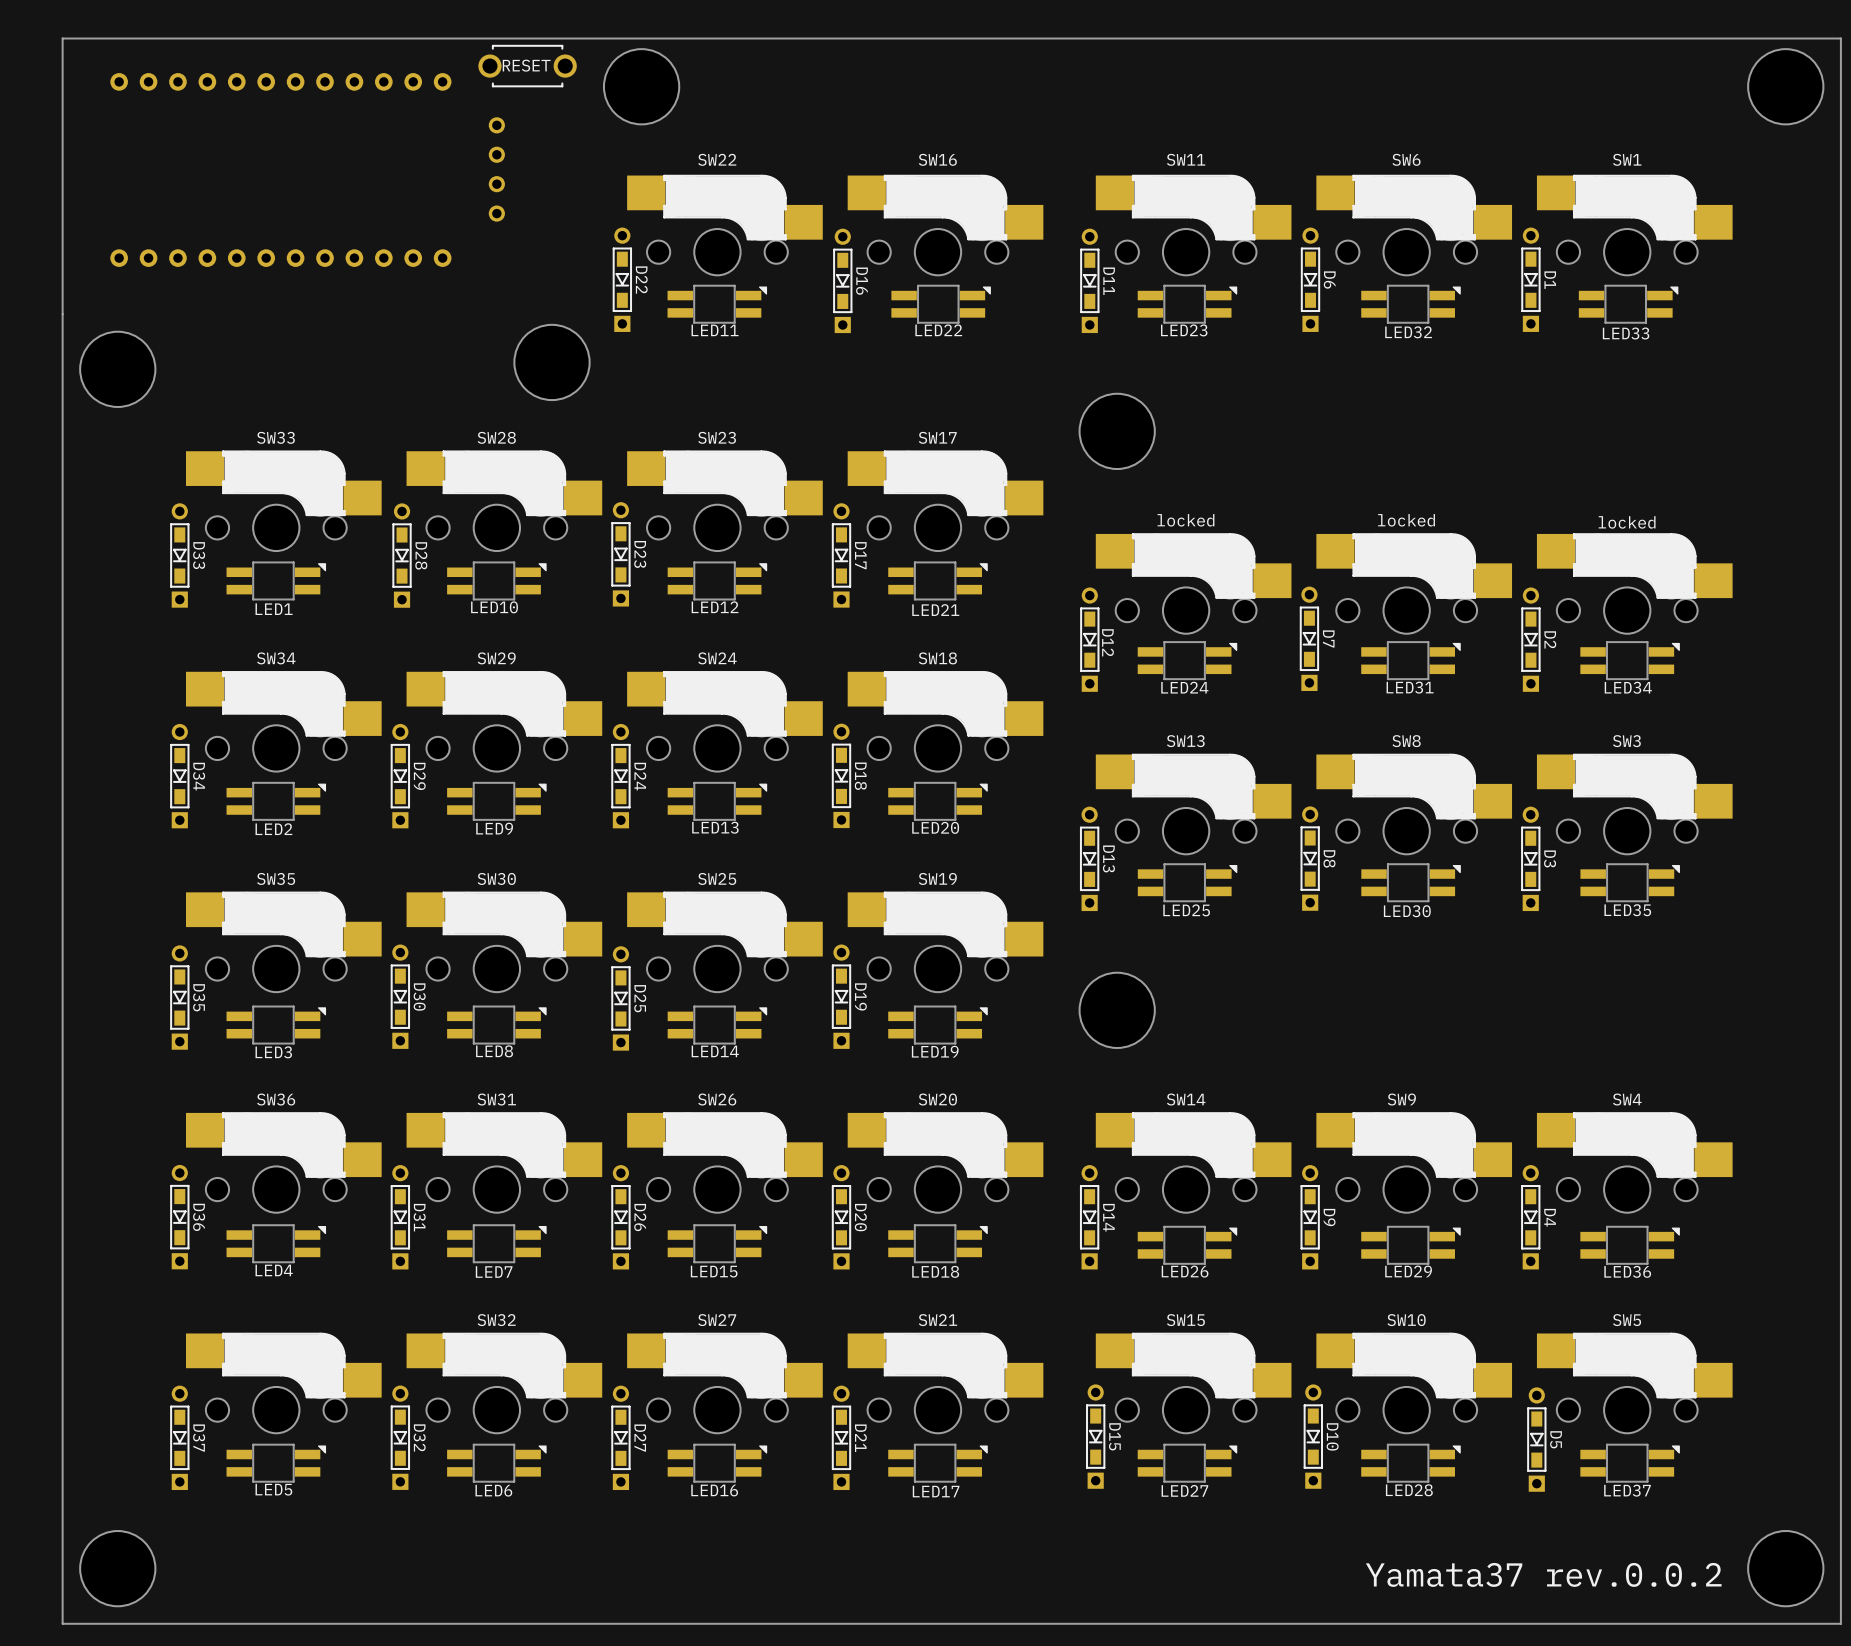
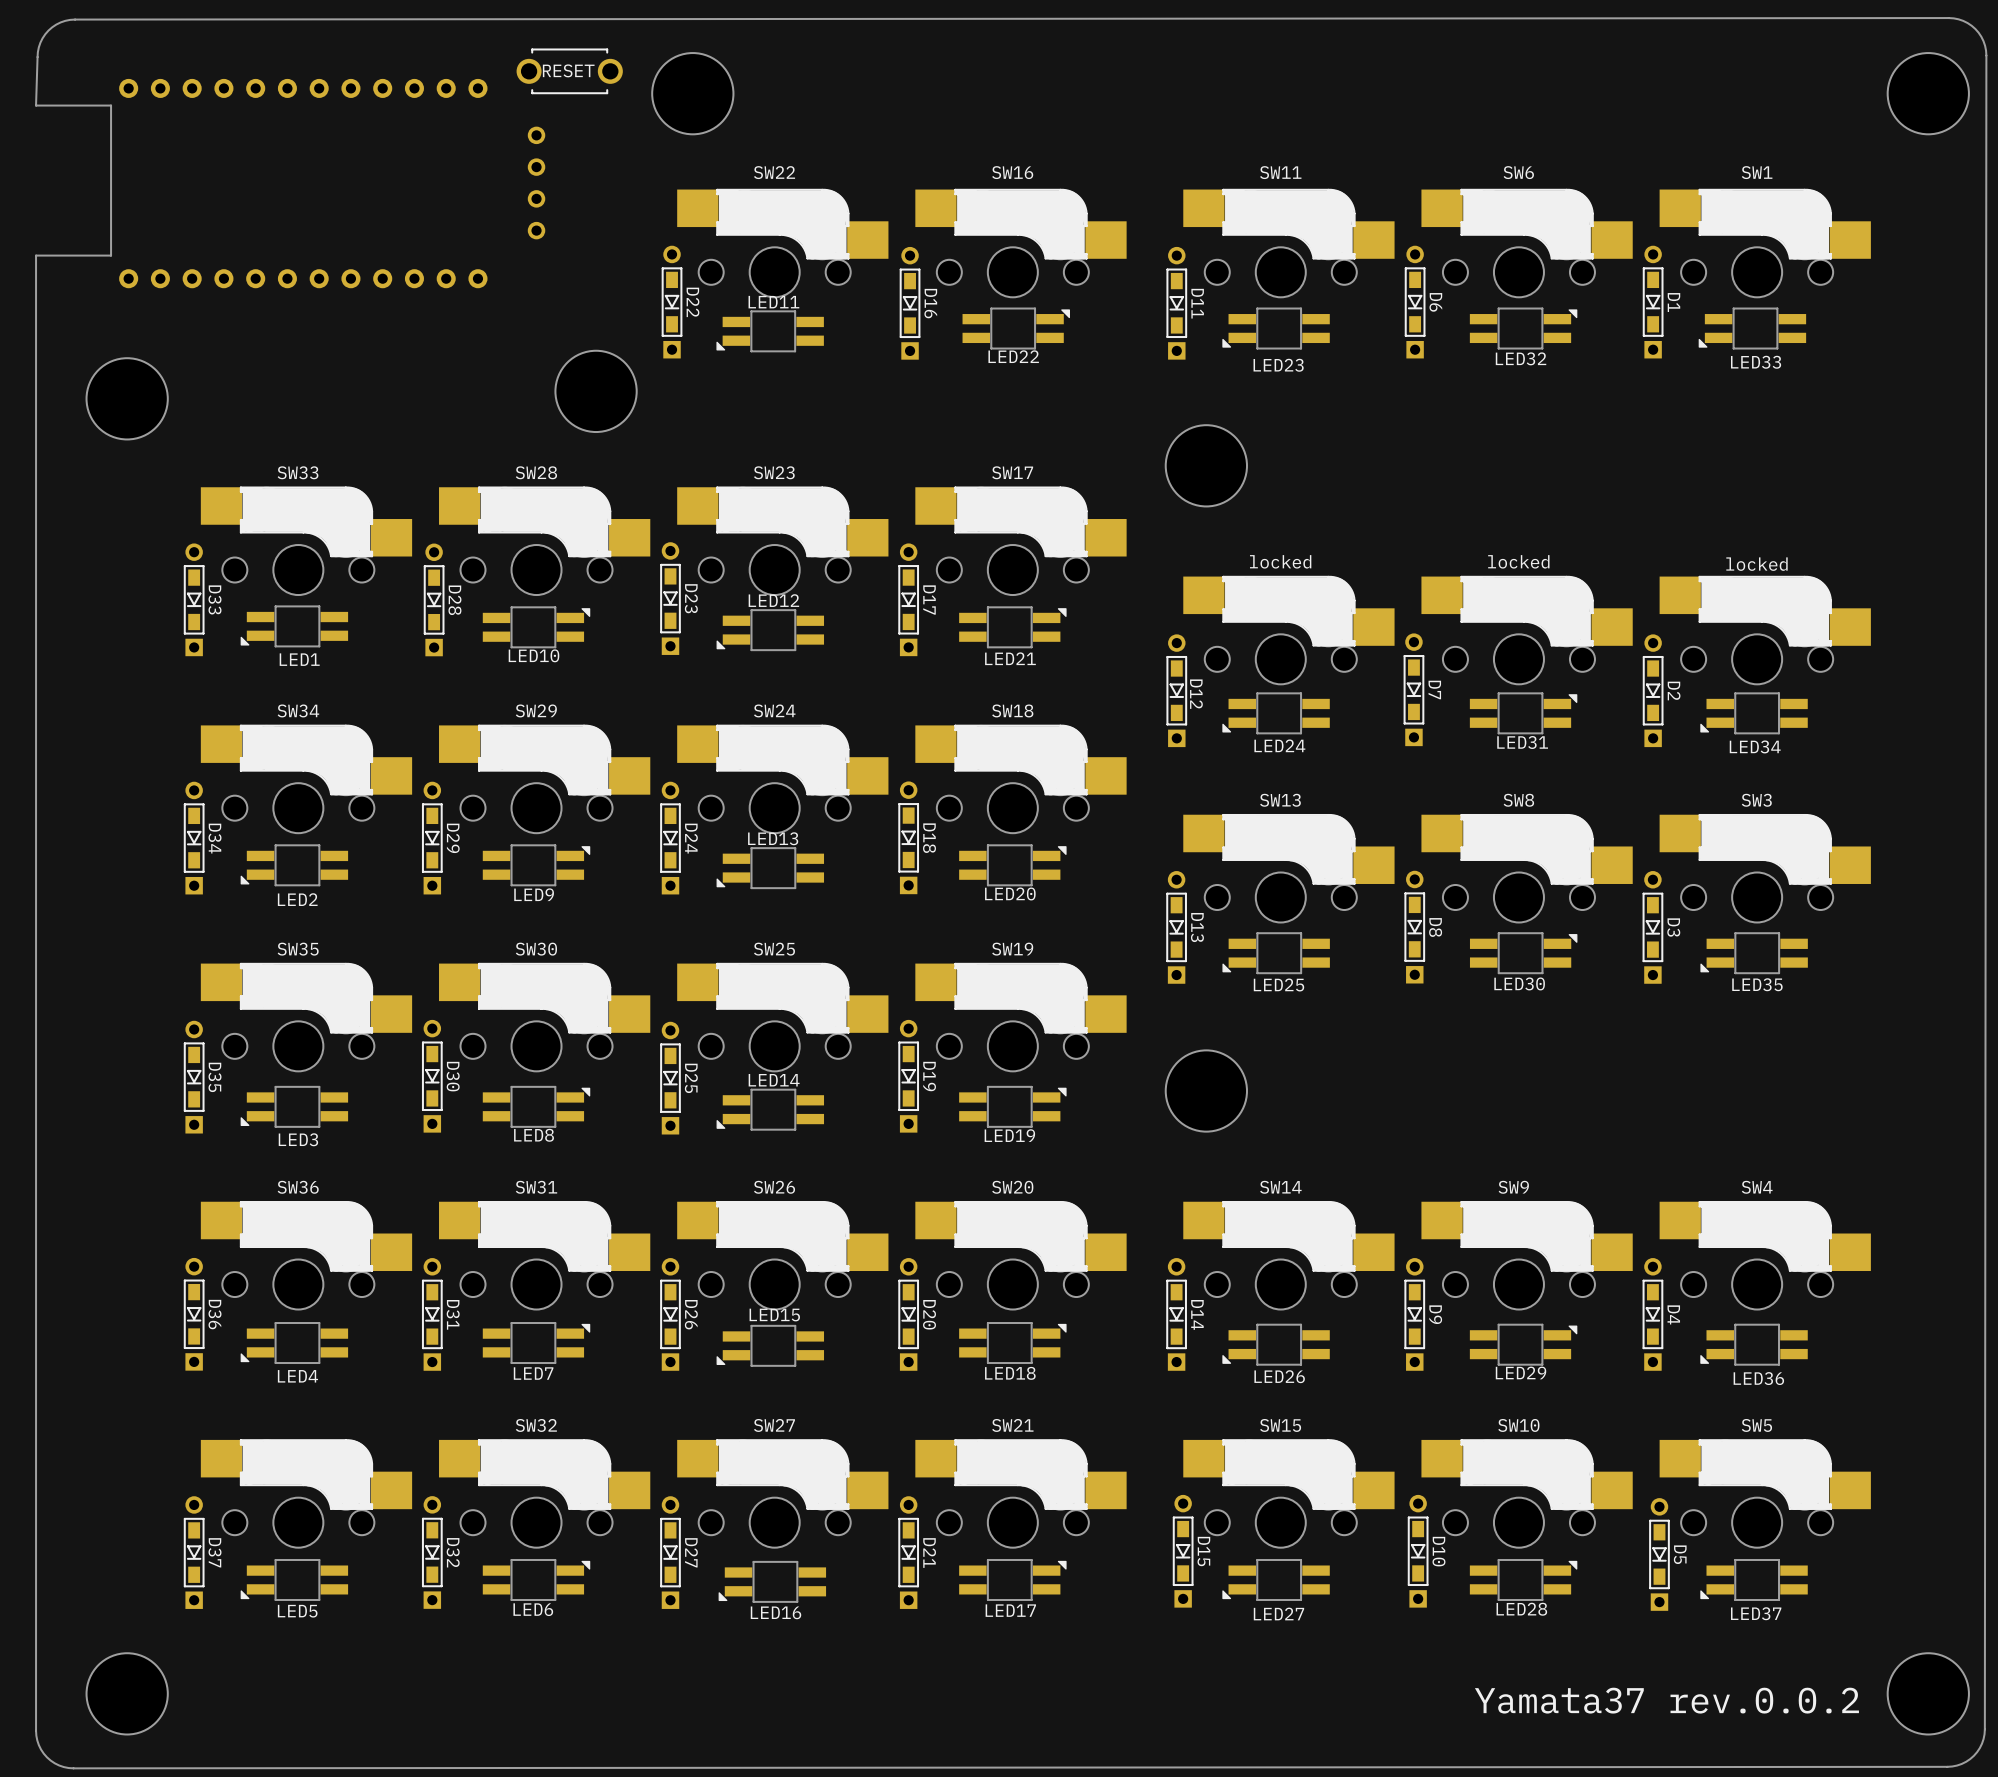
board edge: (1840, 38) (1840, 1623) (62, 1623) (62, 38) (1840, 38) -> (1948, 18) (1963, 20) (1975, 29) (1983, 41) (1986, 55) (1984, 1729) (1982, 1743) (1973, 1755) (1961, 1763) (1947, 1766) (73, 1768) (59, 1765) (47, 1757) (38, 1745) (36, 1730) (36, 255) (111, 255) (111, 105) (36, 105) (37, 52) (42, 38) (48, 30) (60, 22) (75, 19) (1948, 18)
LED11 rotation: 0° (717, 304) -> 180° (770, 331)
LED23 rotation: 0° (1187, 304) -> 180° (1276, 328)
LED33 rotation: 0° (1628, 304) -> 180° (1752, 328)
LED1 rotation: 0° (276, 580) -> 180° (294, 626)
LED12 rotation: 0° (717, 580) -> 180° (770, 630)
LED24 rotation: 0° (1187, 660) -> 180° (1276, 713)
LED34 rotation: 0° (1630, 660) -> 180° (1754, 713)
LED2 rotation: 0° (276, 801) -> 180° (294, 865)
LED13 rotation: 0° (717, 801) -> 180° (770, 868)
LED25 rotation: 0° (1187, 882) -> 180° (1276, 953)
LED35 rotation: 0° (1630, 882) -> 180° (1754, 953)
LED3 rotation: 0° (276, 1025) -> 180° (294, 1106)
LED14 rotation: 0° (717, 1025) -> 180° (770, 1109)
LED4 rotation: 0° (276, 1243) -> 180° (294, 1343)
LED15 rotation: 0° (717, 1243) -> 180° (770, 1345)
LED26 rotation: 0° (1187, 1245) -> 180° (1276, 1344)
LED36 rotation: 0° (1630, 1245) -> 180° (1754, 1344)
LED5 rotation: 0° (276, 1463) -> 180° (294, 1579)
LED16 rotation: 0° (717, 1463) -> 180° (772, 1581)
LED27 rotation: 0° (1187, 1463) -> 180° (1276, 1579)
LED37 rotation: 0° (1630, 1463) -> 180° (1754, 1579)

